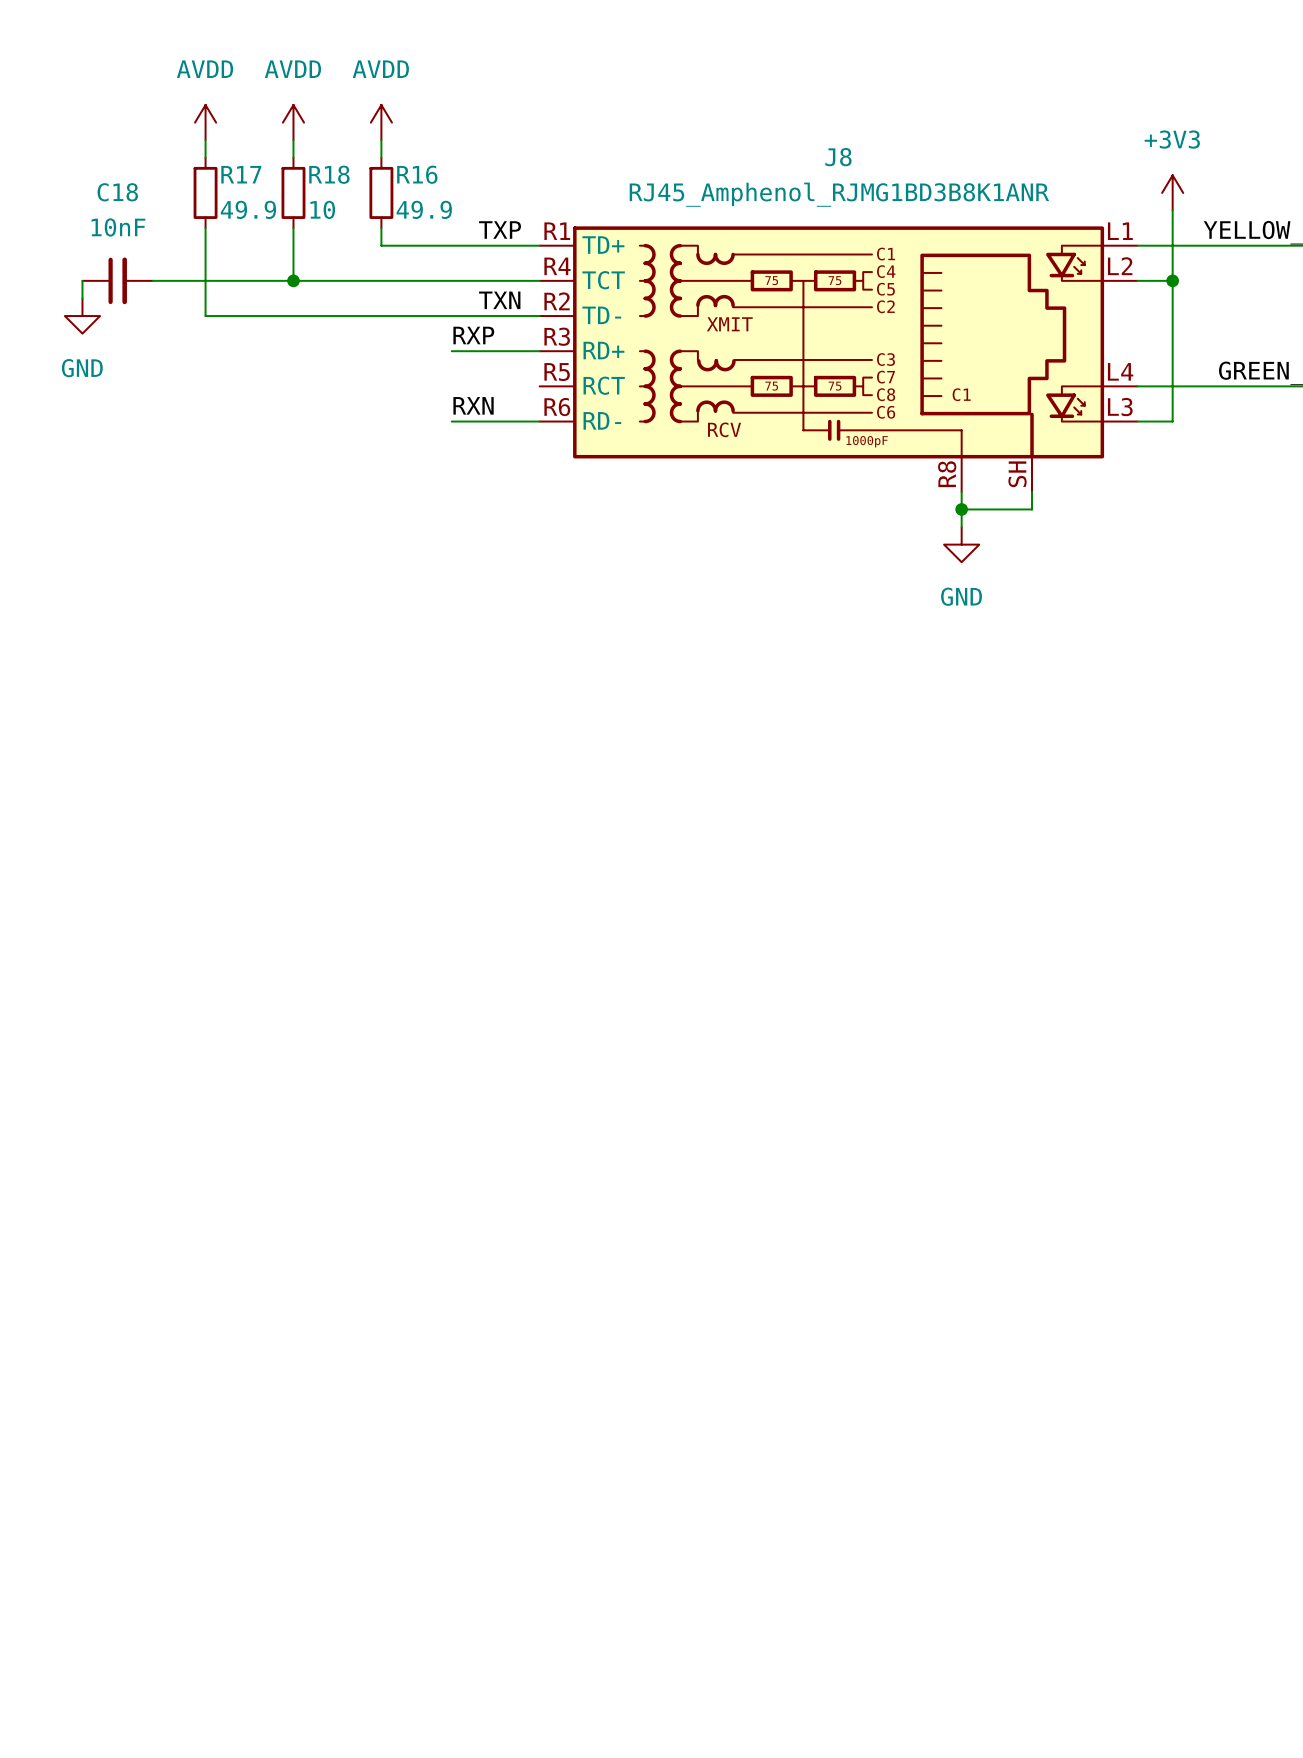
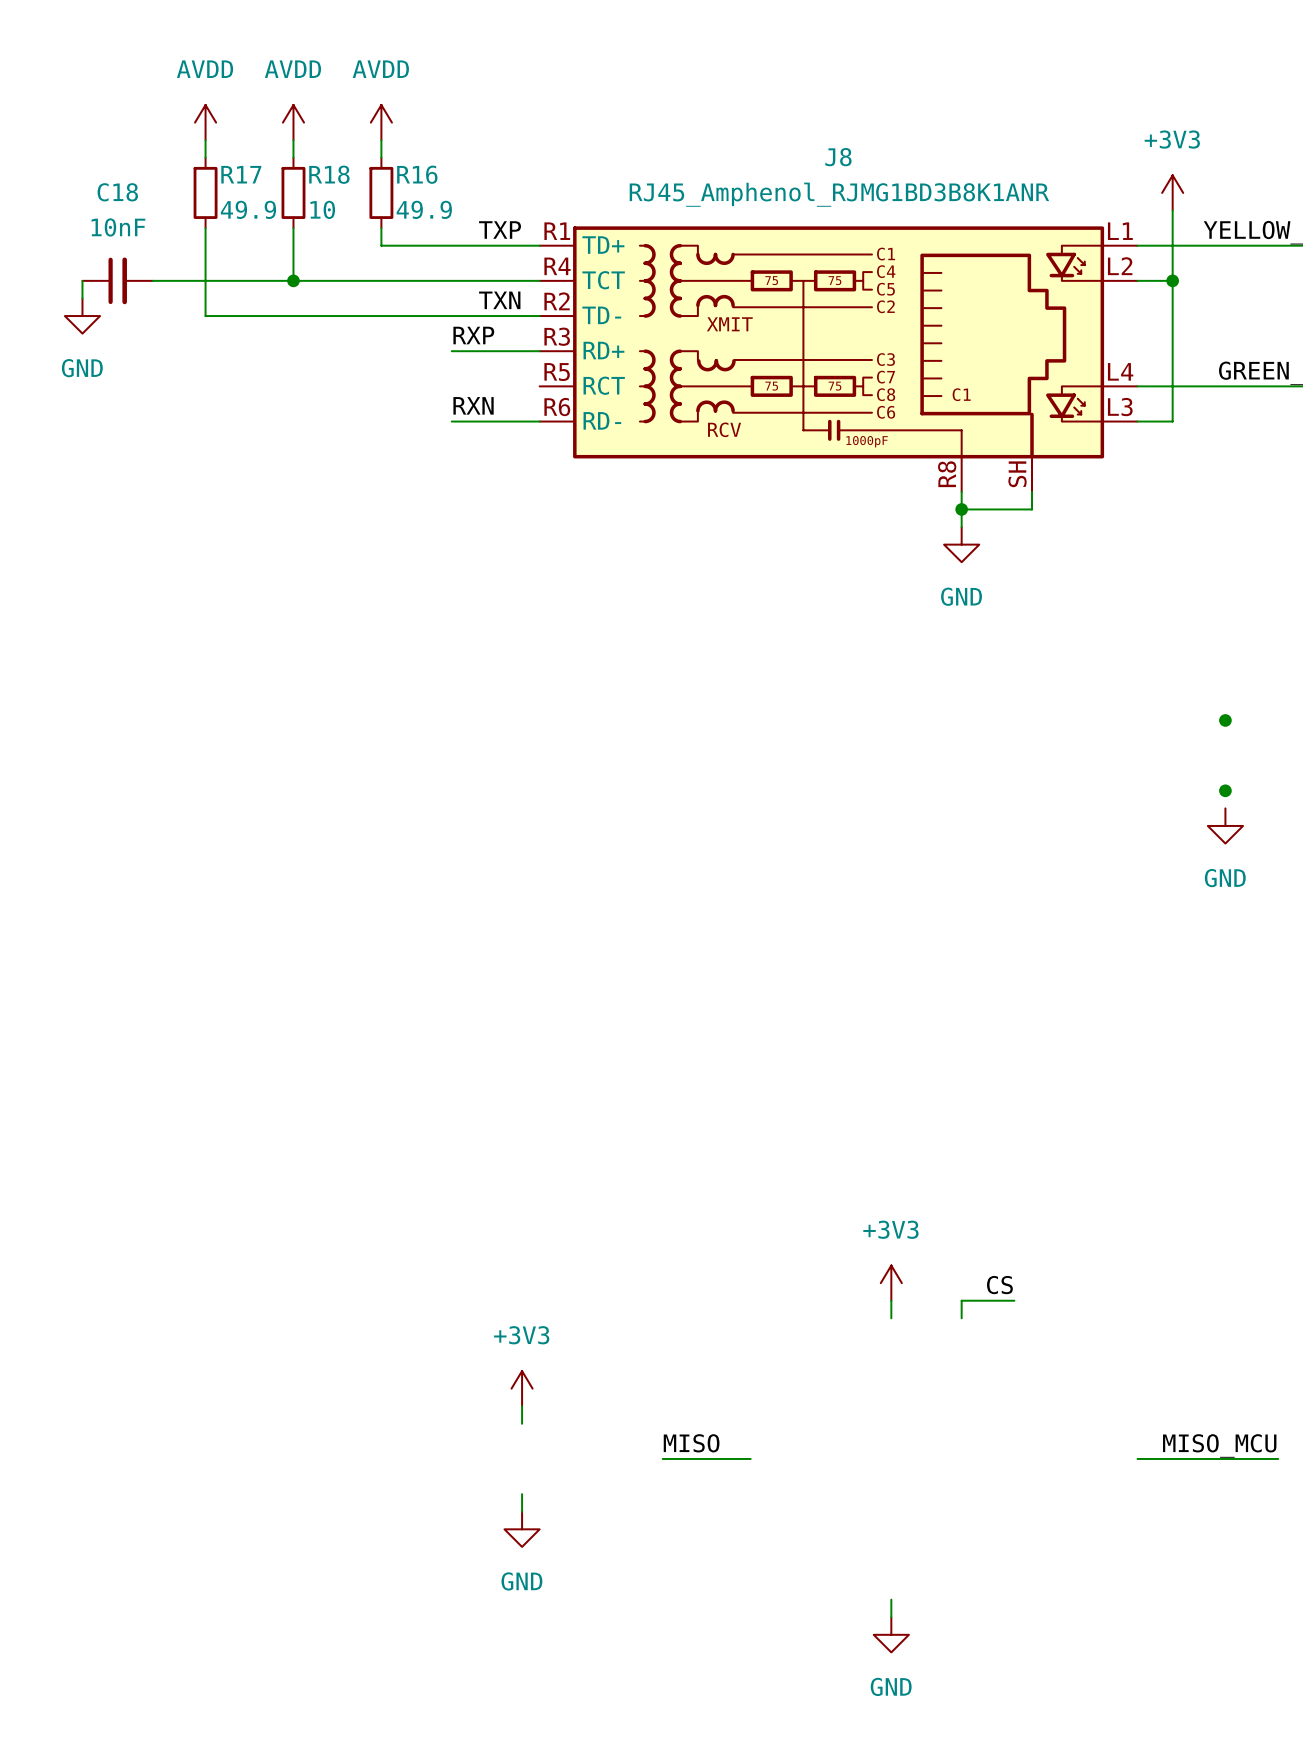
junction: none -> (1225, 720)
junction: none -> (1225, 790)
power symbol: none -> GND (1225, 825)
power symbol: none -> +3V3 (891, 1283)
label: none -> CS (999, 1285)
wire: none -> (891, 1300) (891, 1318)
wire: none -> (1014, 1300) (961, 1300) (961, 1318)
power symbol: none -> +3V3 (522, 1388)
wire: none -> (522, 1406) (522, 1423)
label: none -> MISO (691, 1443)
label: none -> MISO_MCU (1219, 1445)
wire: none -> (662, 1458) (750, 1458)
wire: none -> (1137, 1458) (1278, 1458)
wire: none -> (522, 1494) (522, 1511)
power symbol: none -> GND (522, 1529)
wire: none -> (891, 1599) (891, 1617)
power symbol: none -> GND (891, 1634)

